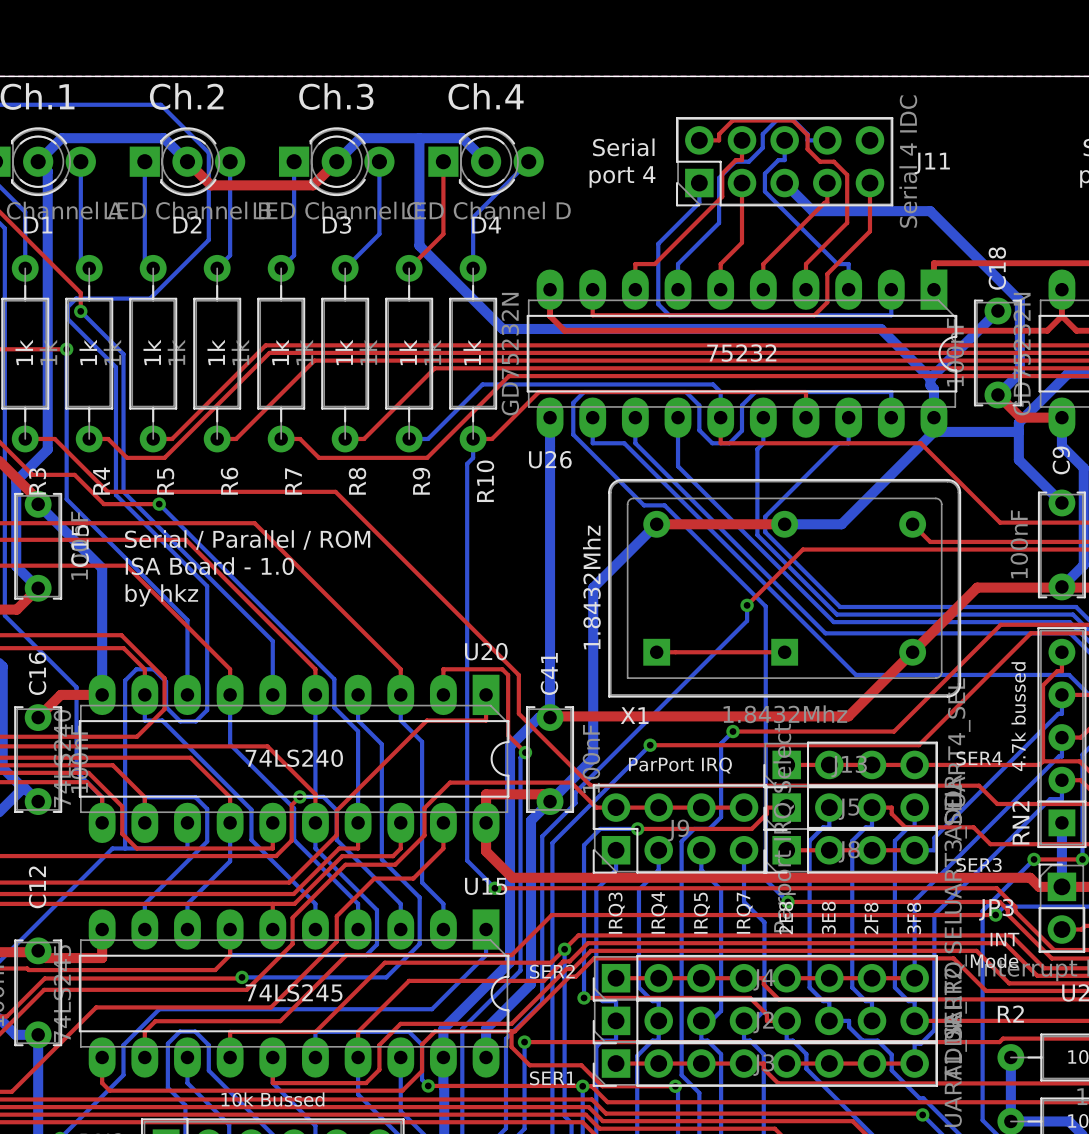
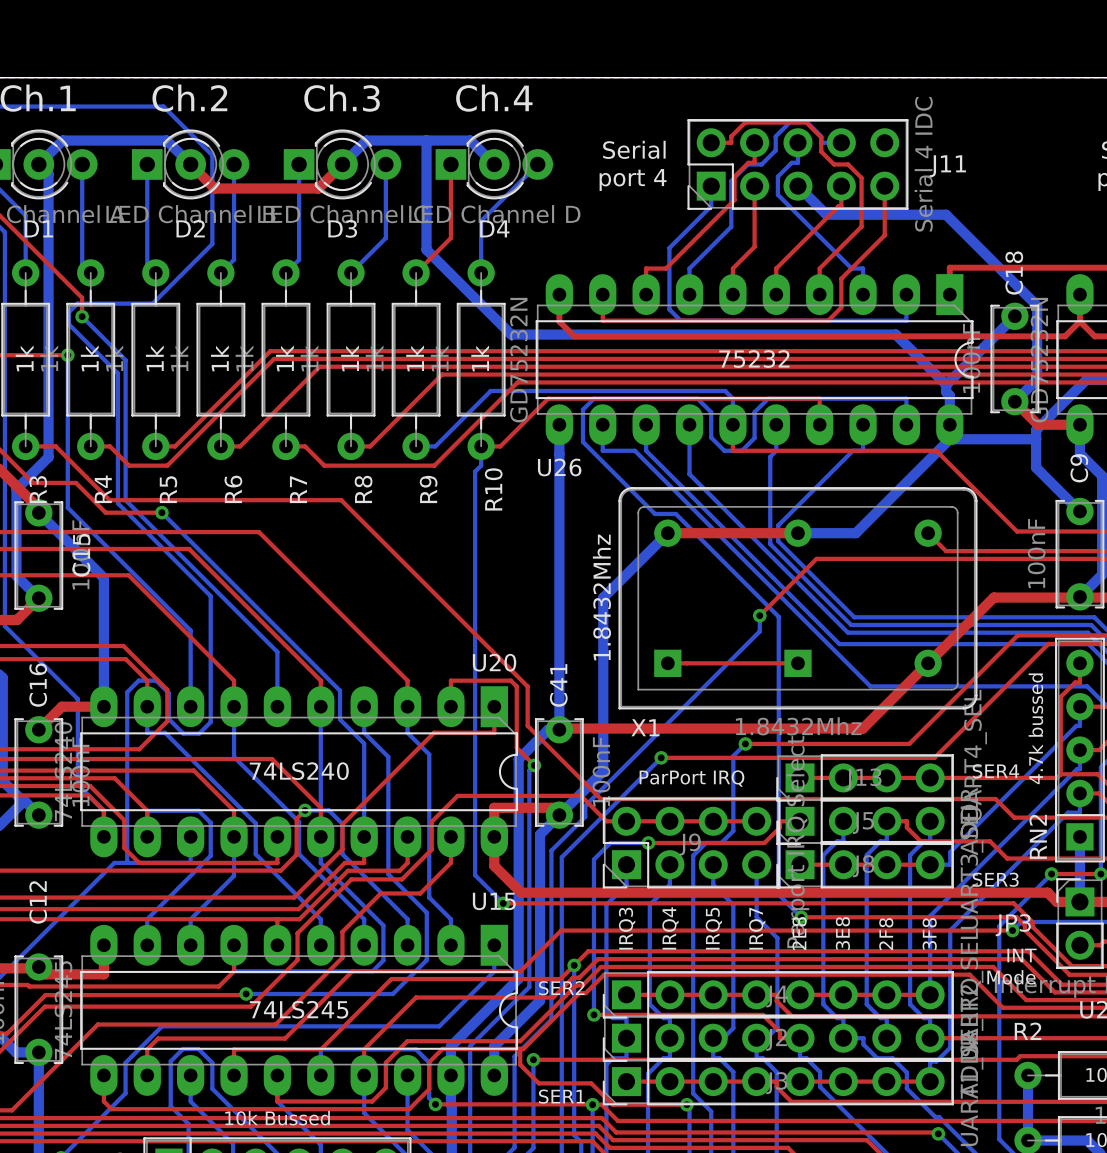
text: Serial / Parallel / ROM (247, 539) -> none
text: ISA Board - 1.0 (209, 566) -> none
text: by hkz (161, 595) -> none

